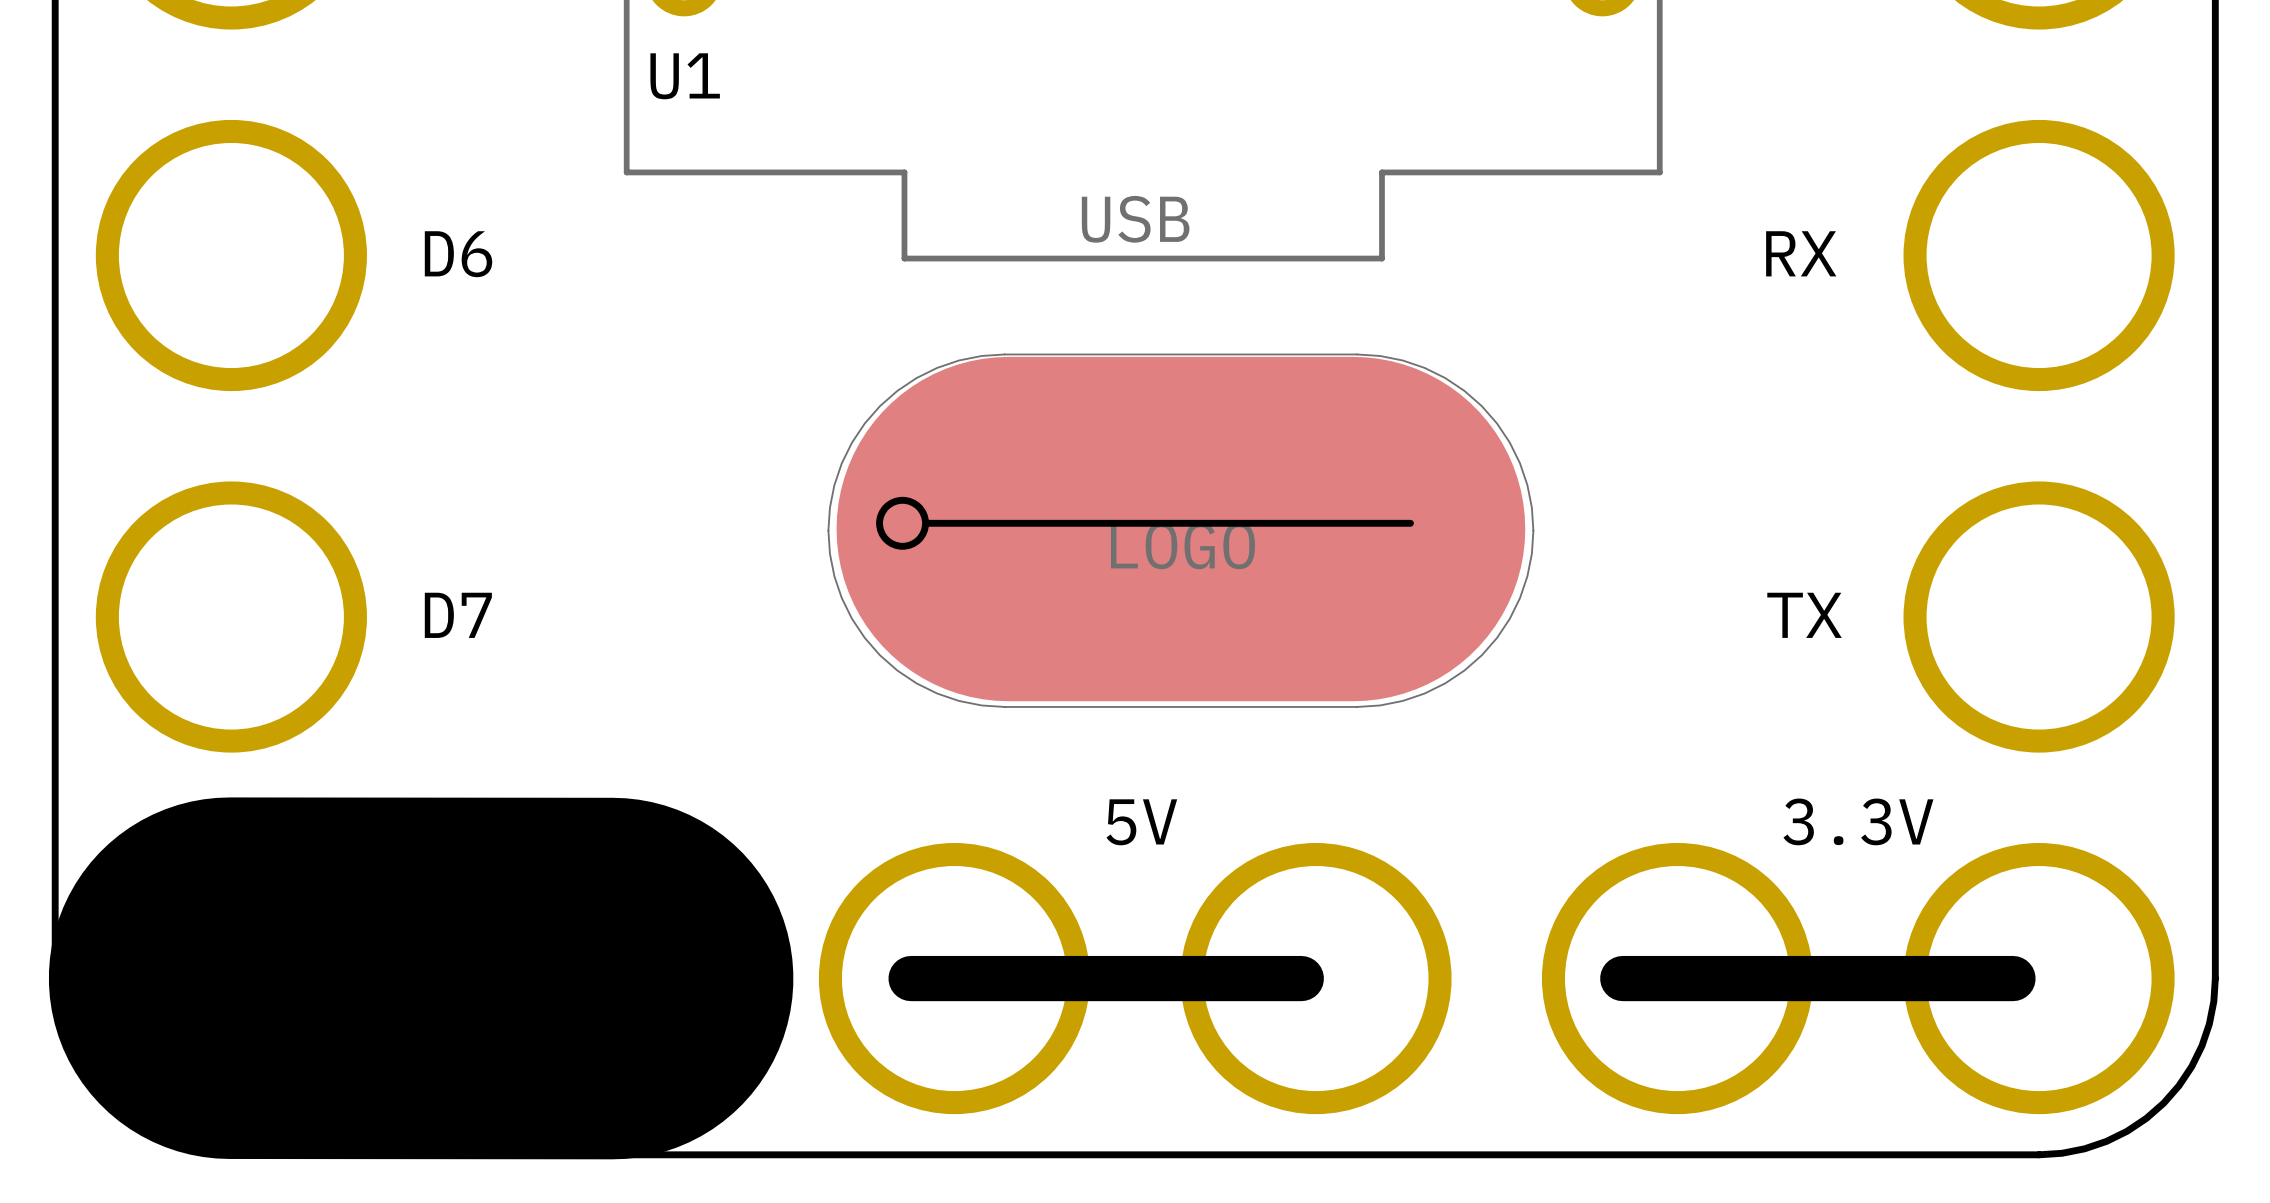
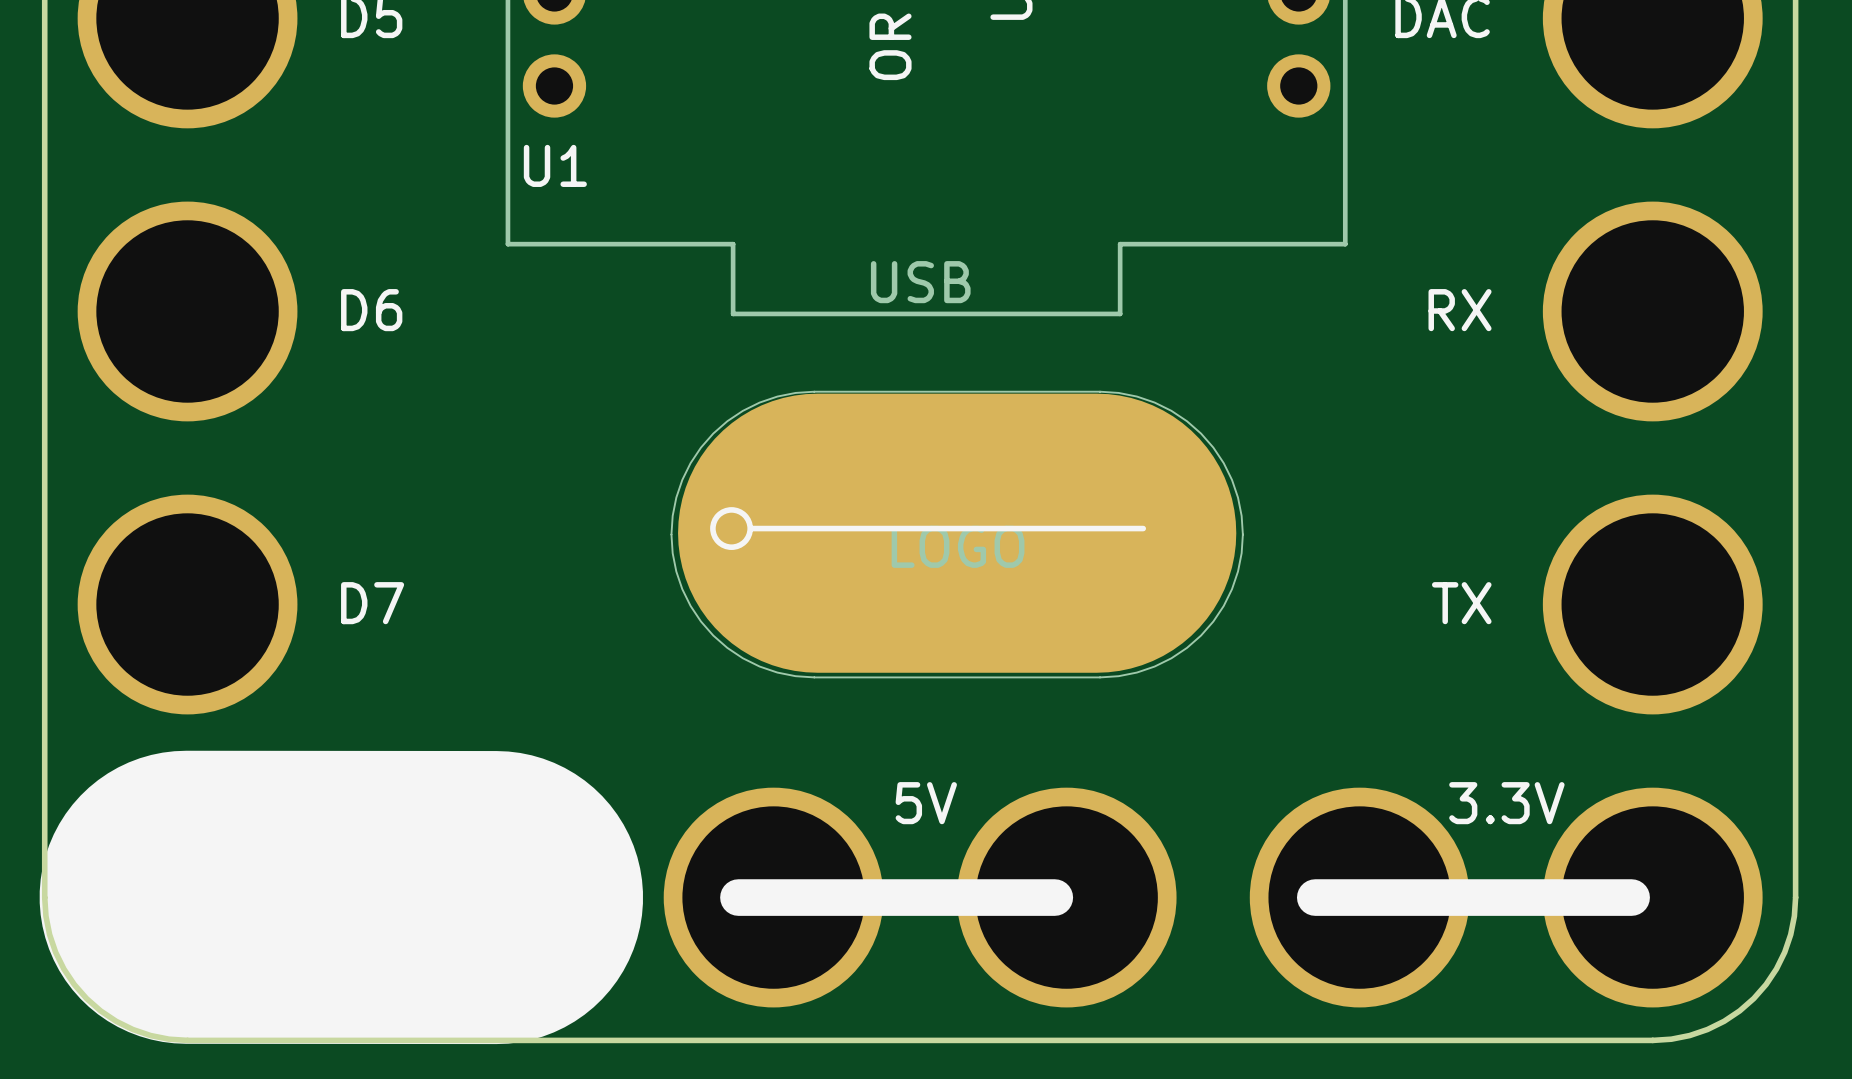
U1 text position: 3.3V (1858, 821) -> 3.3V (1506, 803)
U1 text position: 5V (1141, 822) -> 5V (926, 803)

